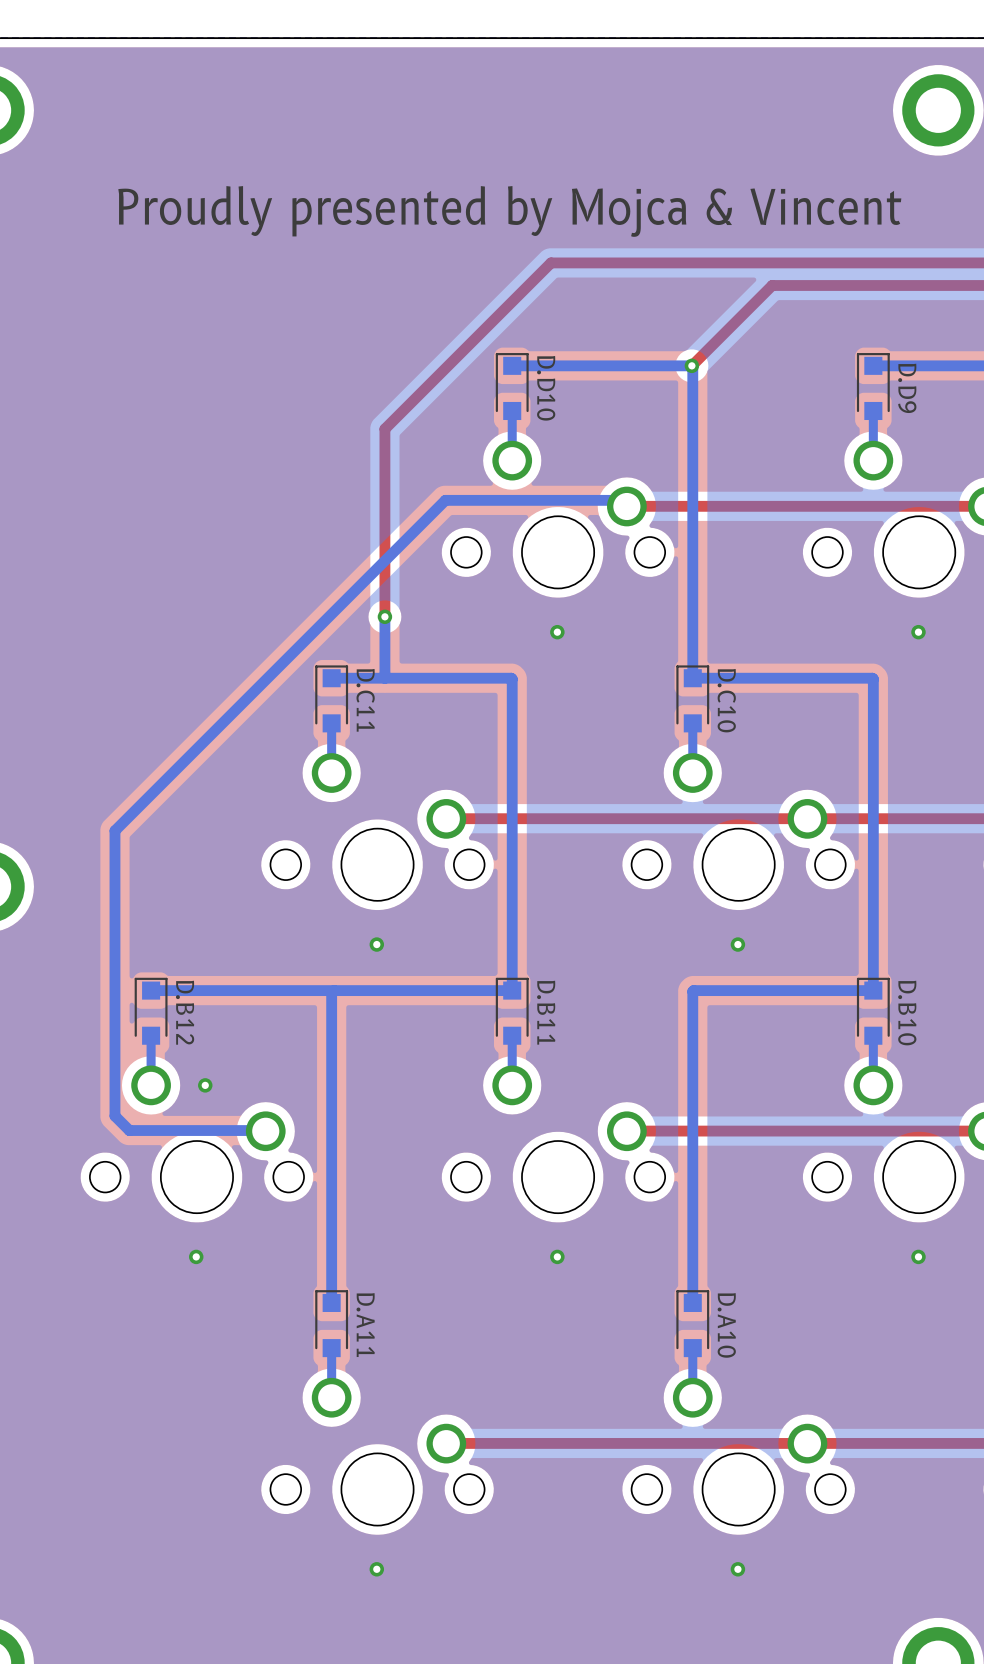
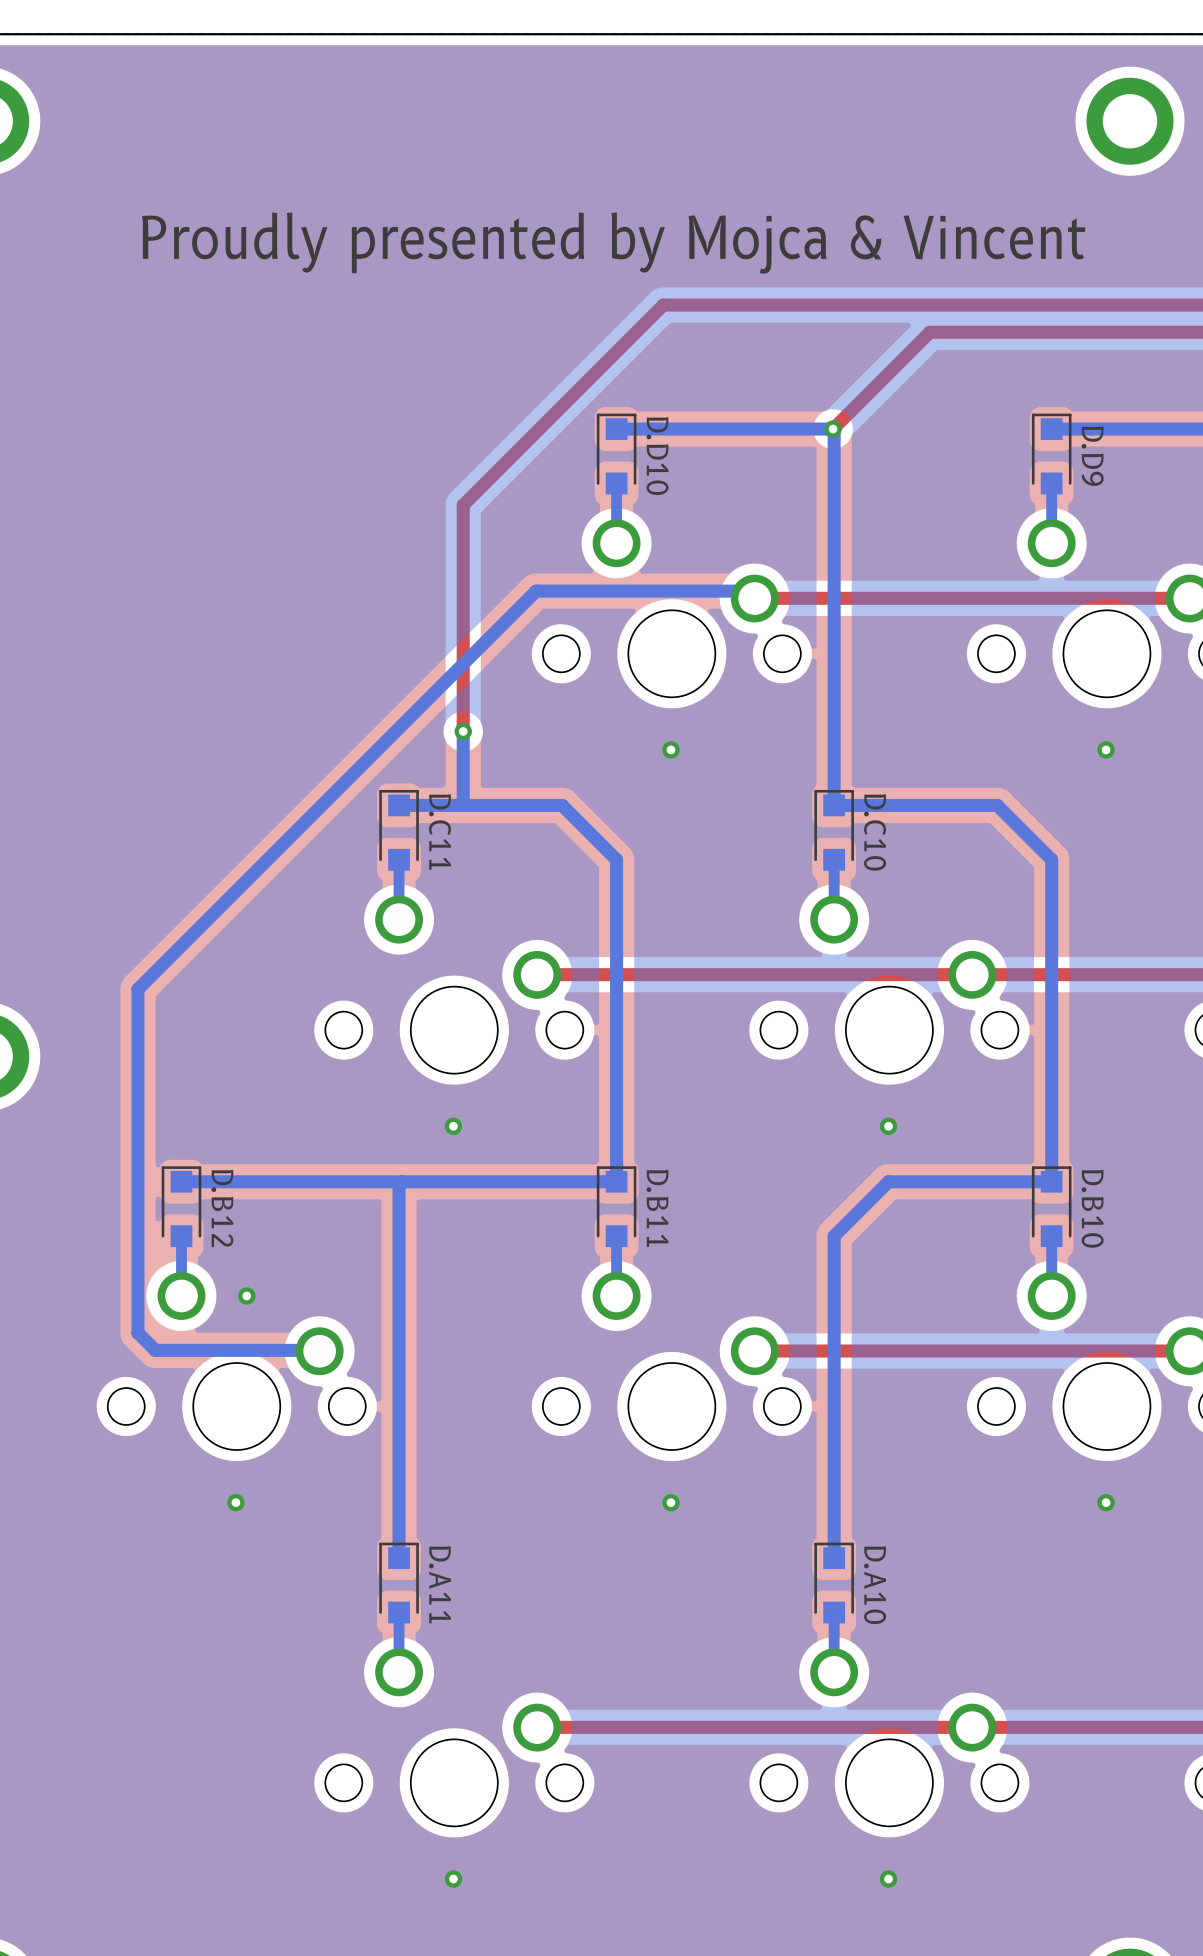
bottom track: (467, 678) (512, 679) (512, 723) -> (562, 805) (616, 859)
bottom track: (828, 678) (873, 679) (873, 723) -> (997, 805) (1051, 859)
bottom track: (737, 990) (692, 991) (692, 1035) -> (888, 1181) (834, 1236)

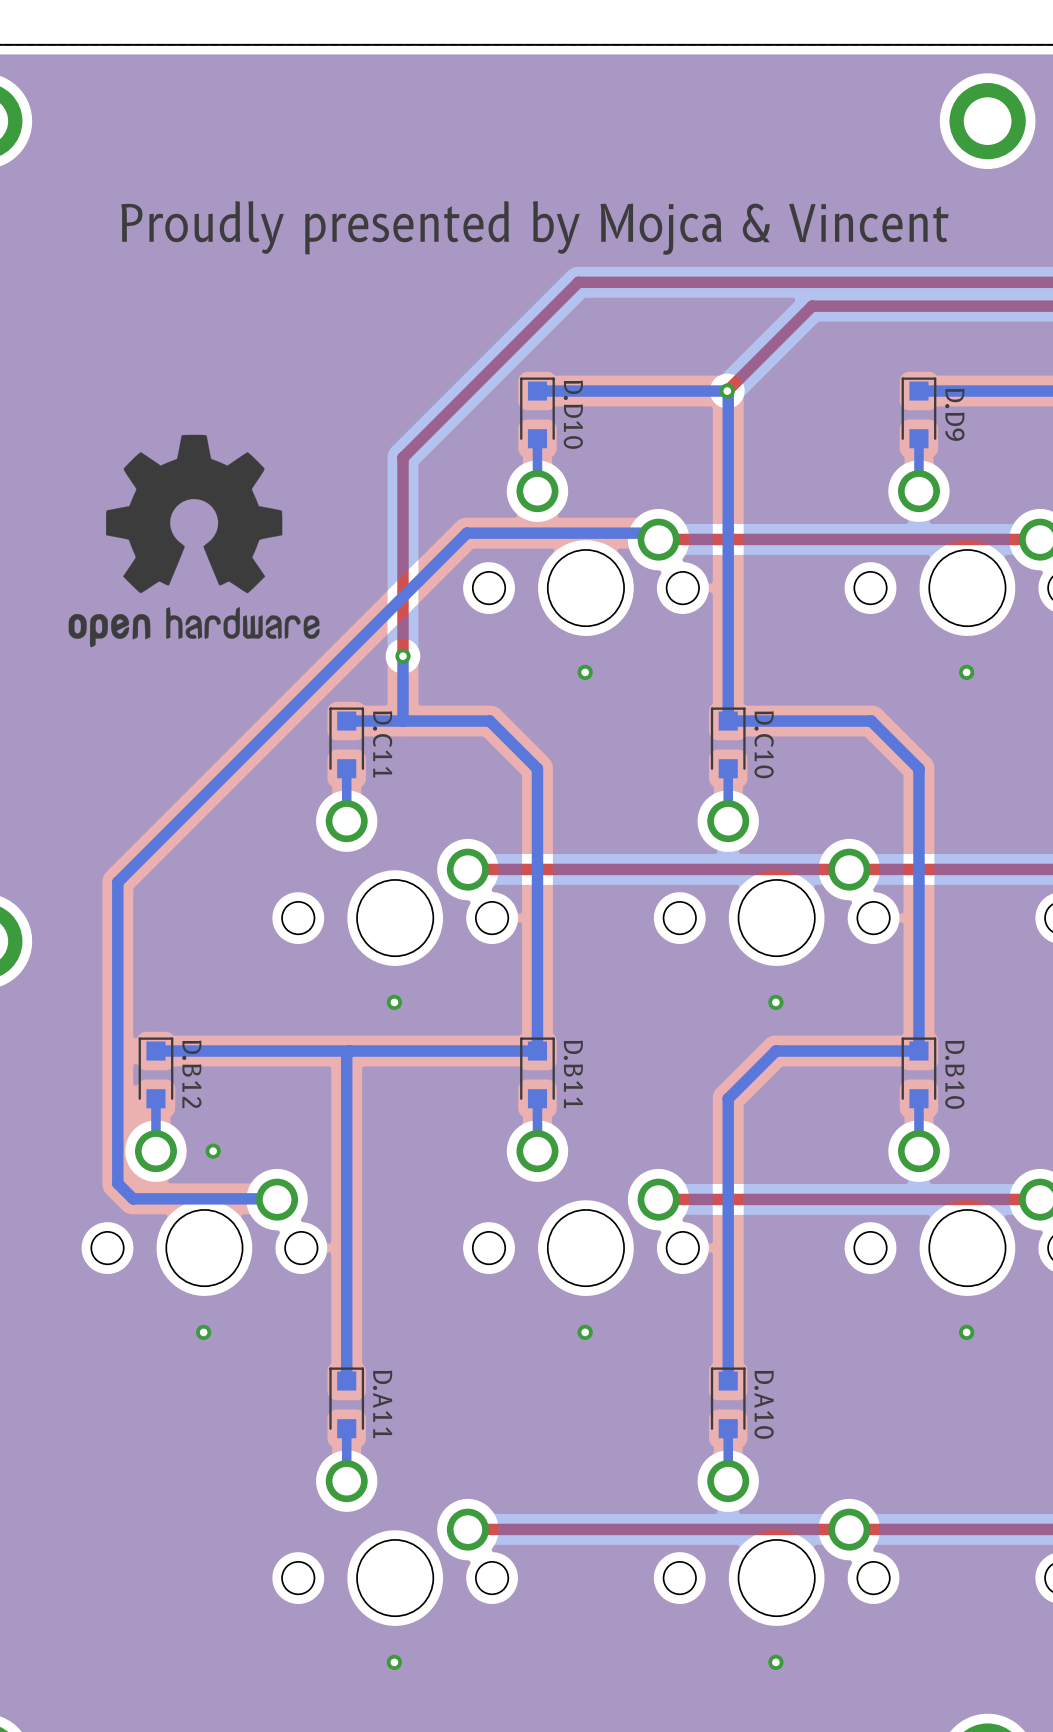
drawing: none -> [68, 434, 320, 648]

